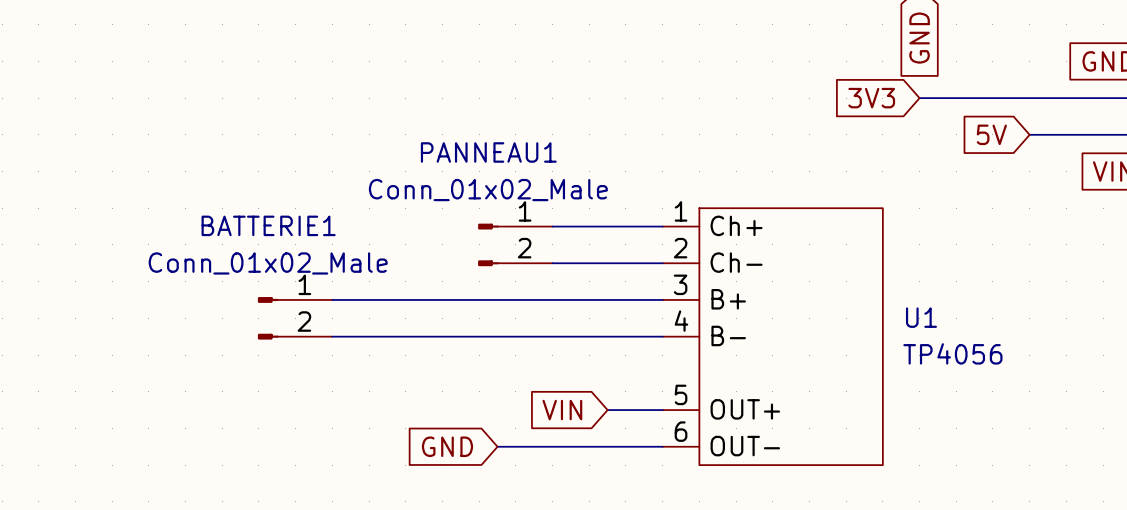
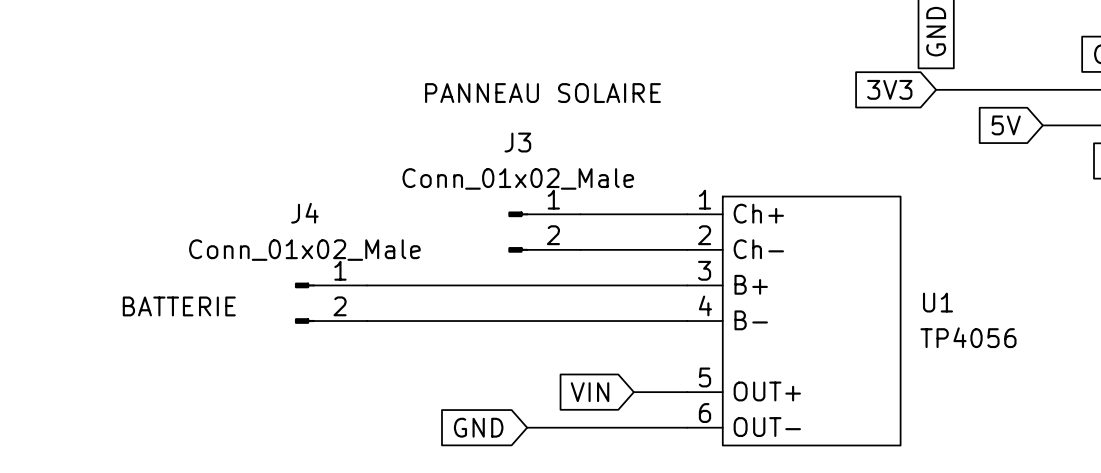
text: none -> PANNEAU SOLAIRE (542, 93)
PANNEAU1 name: PANNEAU1 (488, 152) -> J3 (517, 142)
BATTERIE1 name: BATTERIE1 (268, 225) -> J4 (304, 213)
text: none -> BATTERIE (179, 306)

